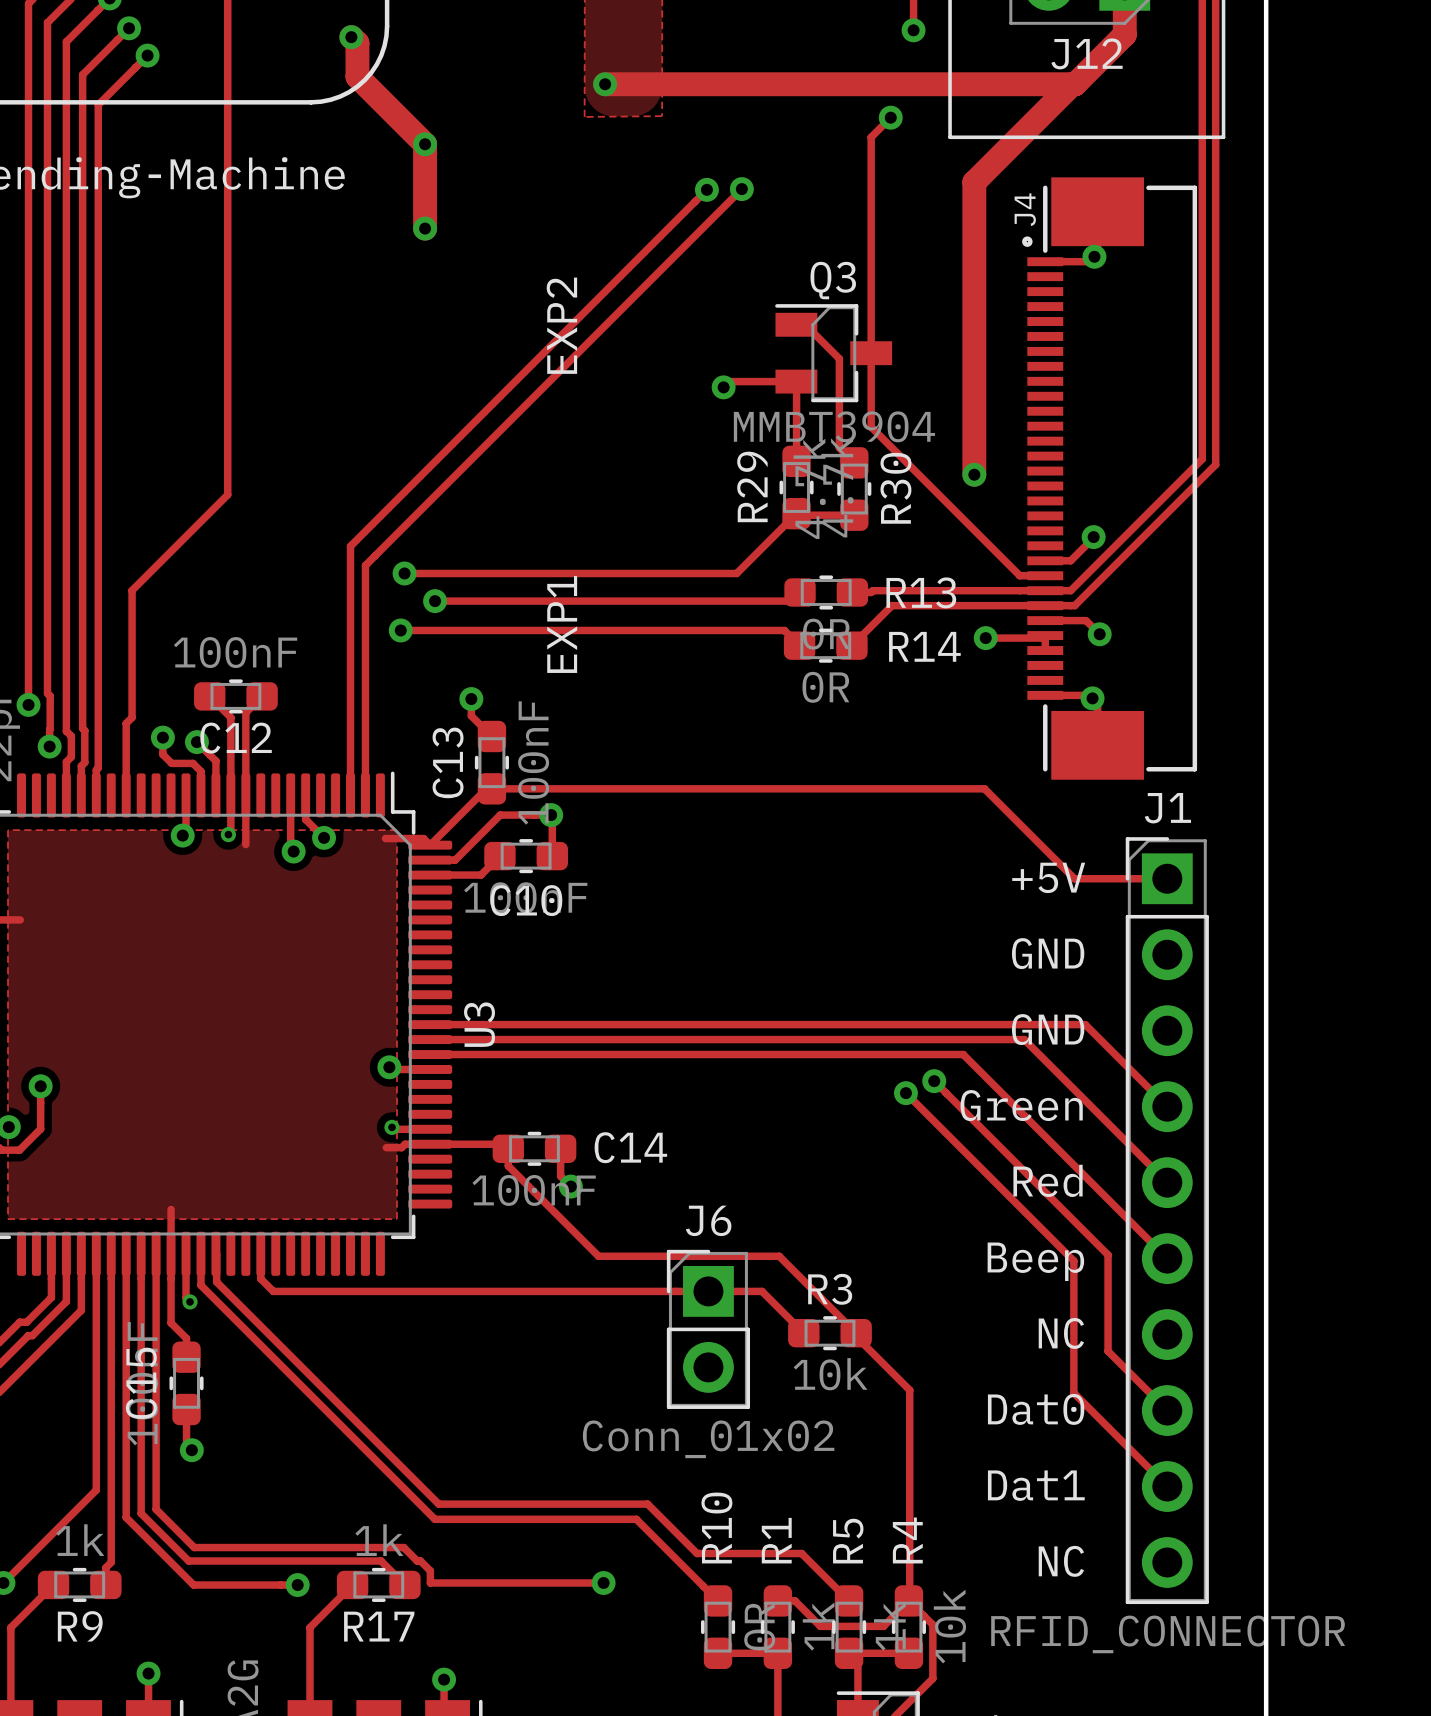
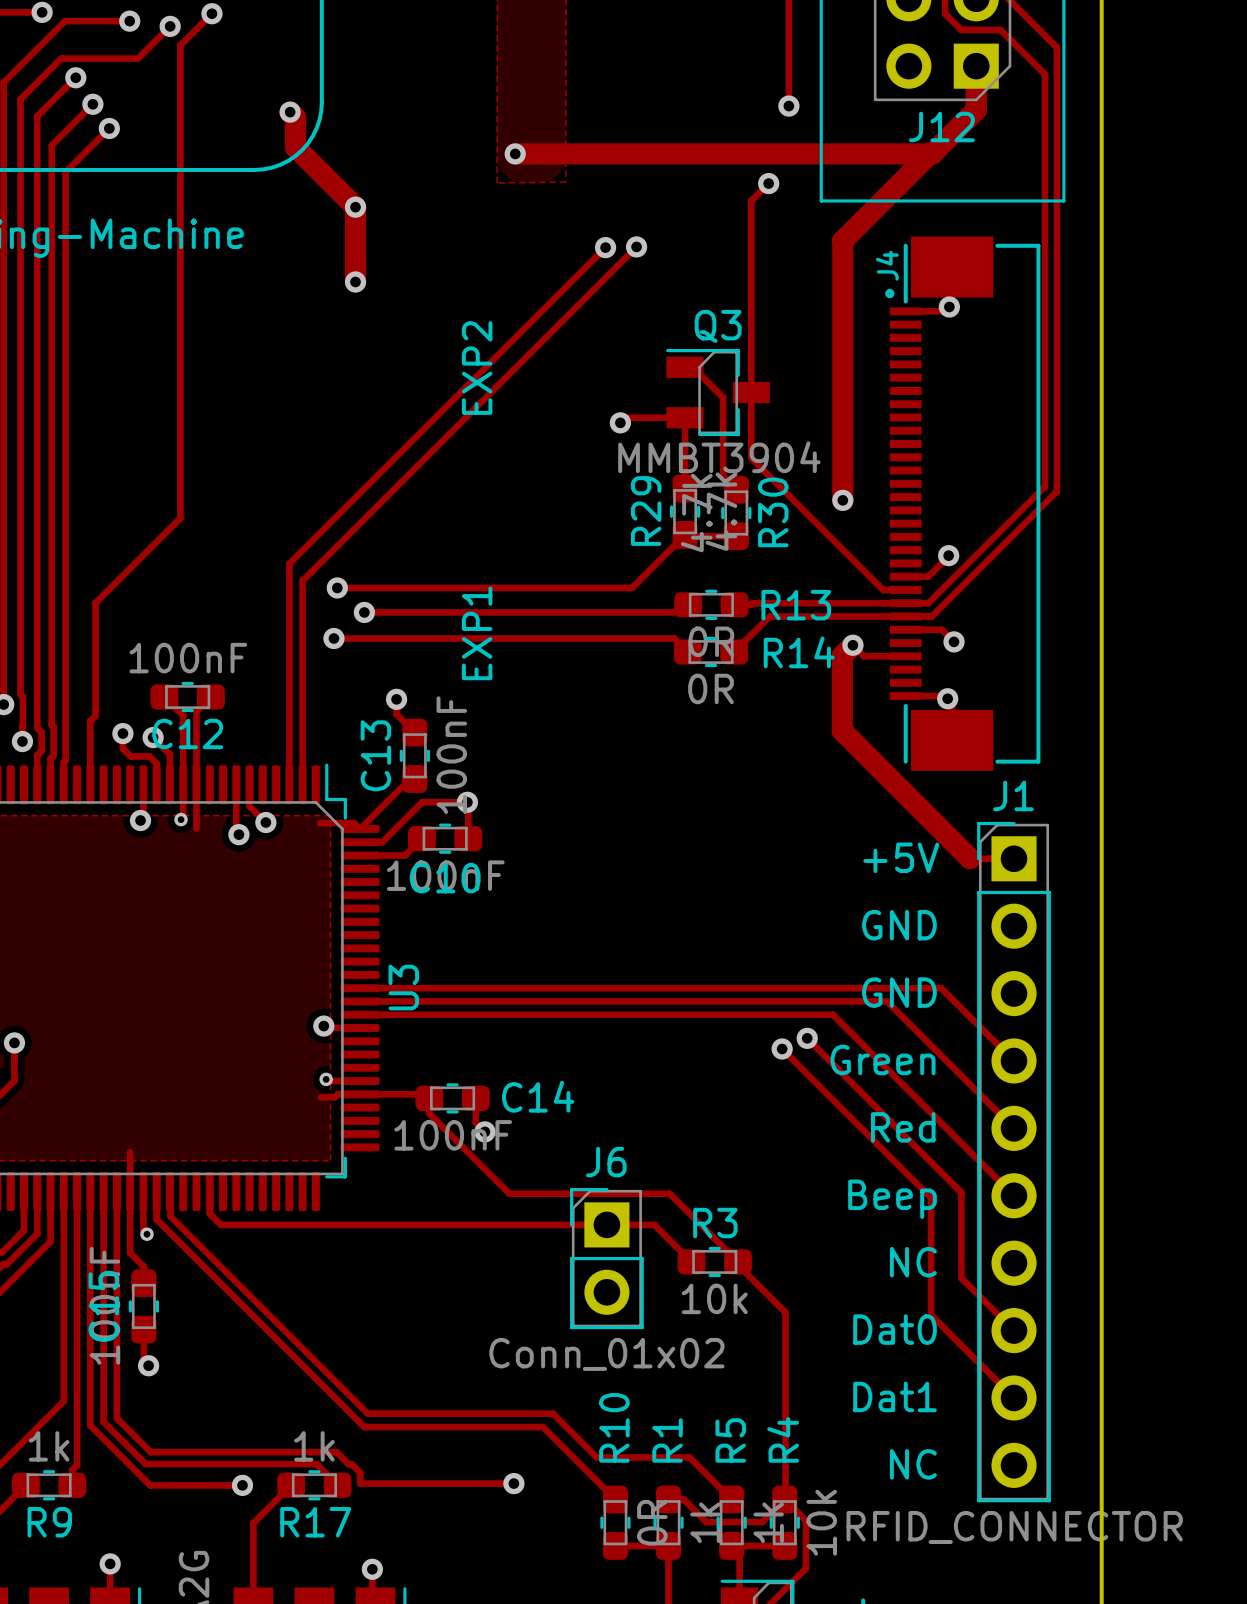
track: (985, 638) (1042, 638) (1045, 635) (1045, 650) -> (970, 858) (842, 730) (842, 655) (852, 645) (863, 656) (905, 656)
track: (491, 788) (984, 788) (1074, 878) (1117, 878) -> none

